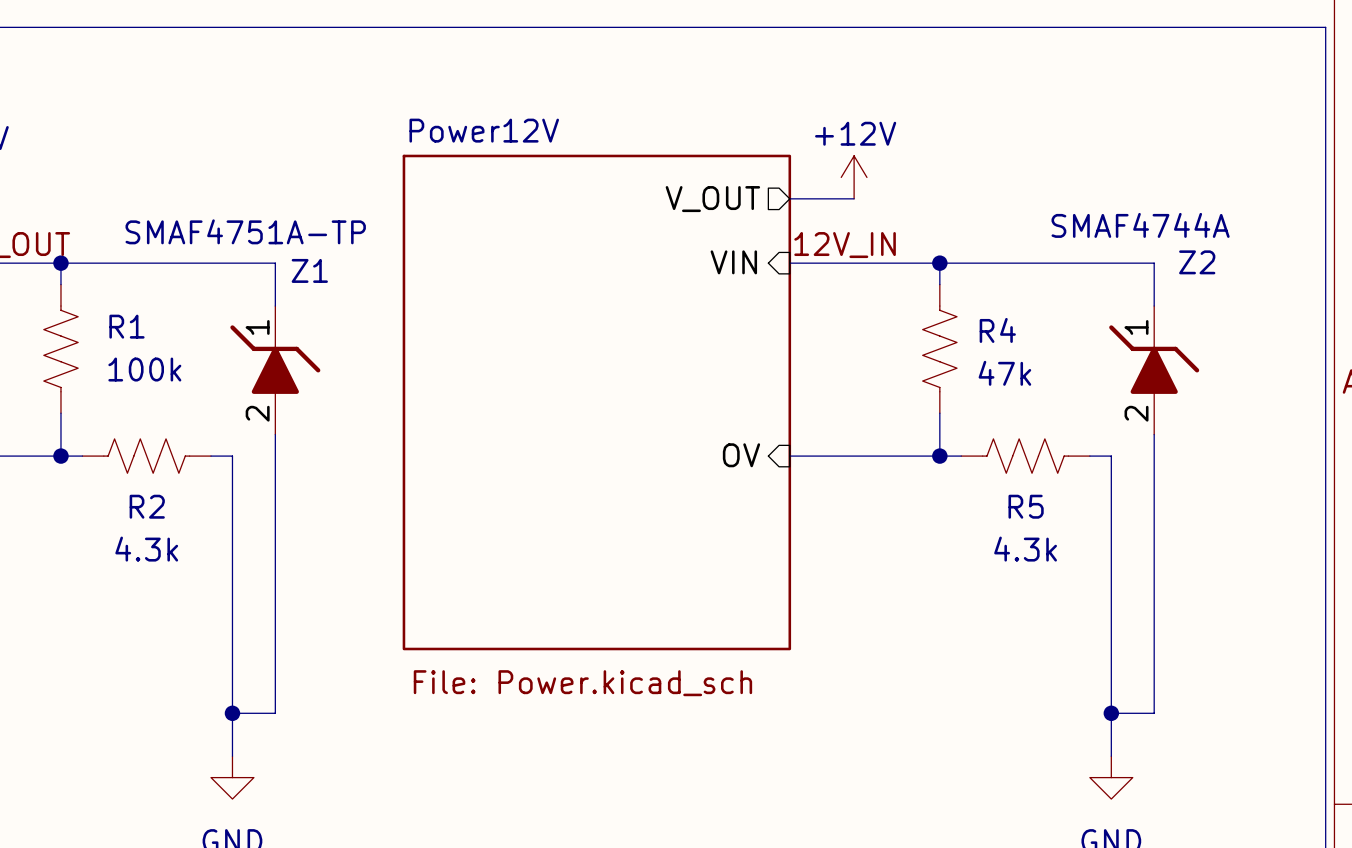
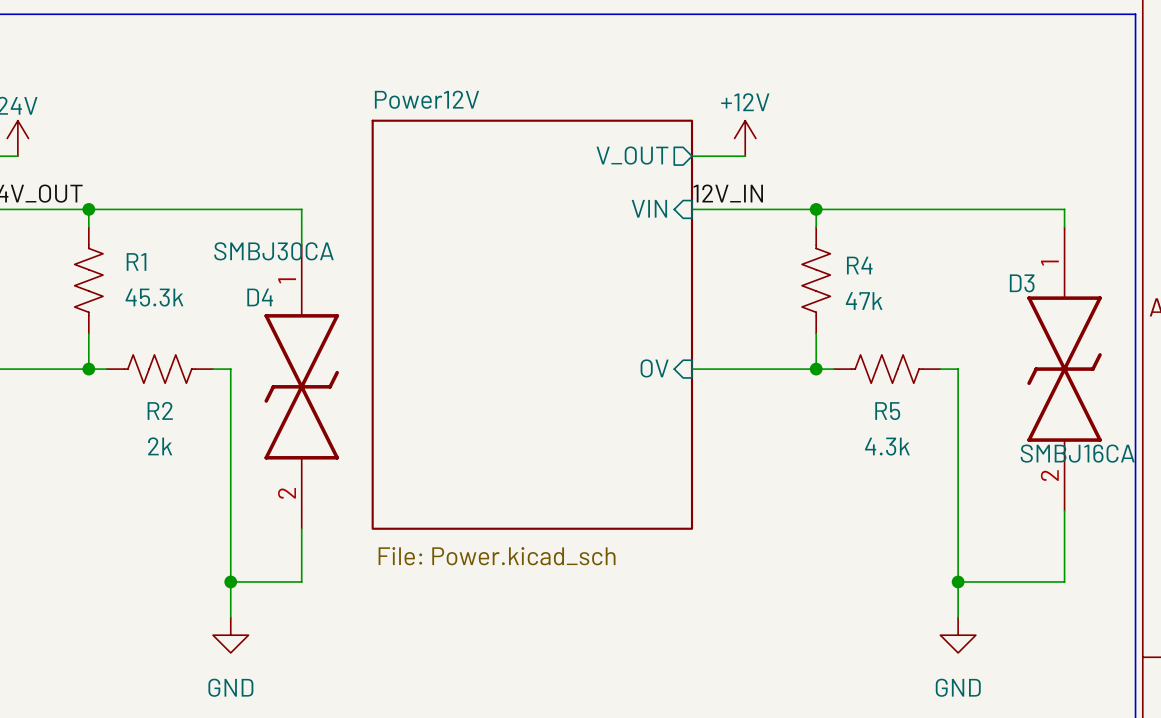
wire: (275, 263) (275, 306) -> (266, 209) (301, 209) (301, 244)
wire: (1154, 263) (1154, 306) -> (993, 209) (1064, 209) (1064, 227)
R1 value: 100k (144, 369) -> 45.3k (154, 297)
Z1: SMAF4751A-TP (275, 370) -> none
Z2: SMAF4744A (1154, 370) -> none
wire: (275, 434) (275, 713) -> (301, 528) (301, 581) (266, 581)
wire: (1154, 434) (1154, 713) -> (1064, 511) (1064, 581) (993, 581)
D3: none -> SMBJ16CA (1064, 369)
D4: none -> SMBJ30CA (301, 386)
R2 value: 4.3k (146, 549) -> 2k (160, 446)

